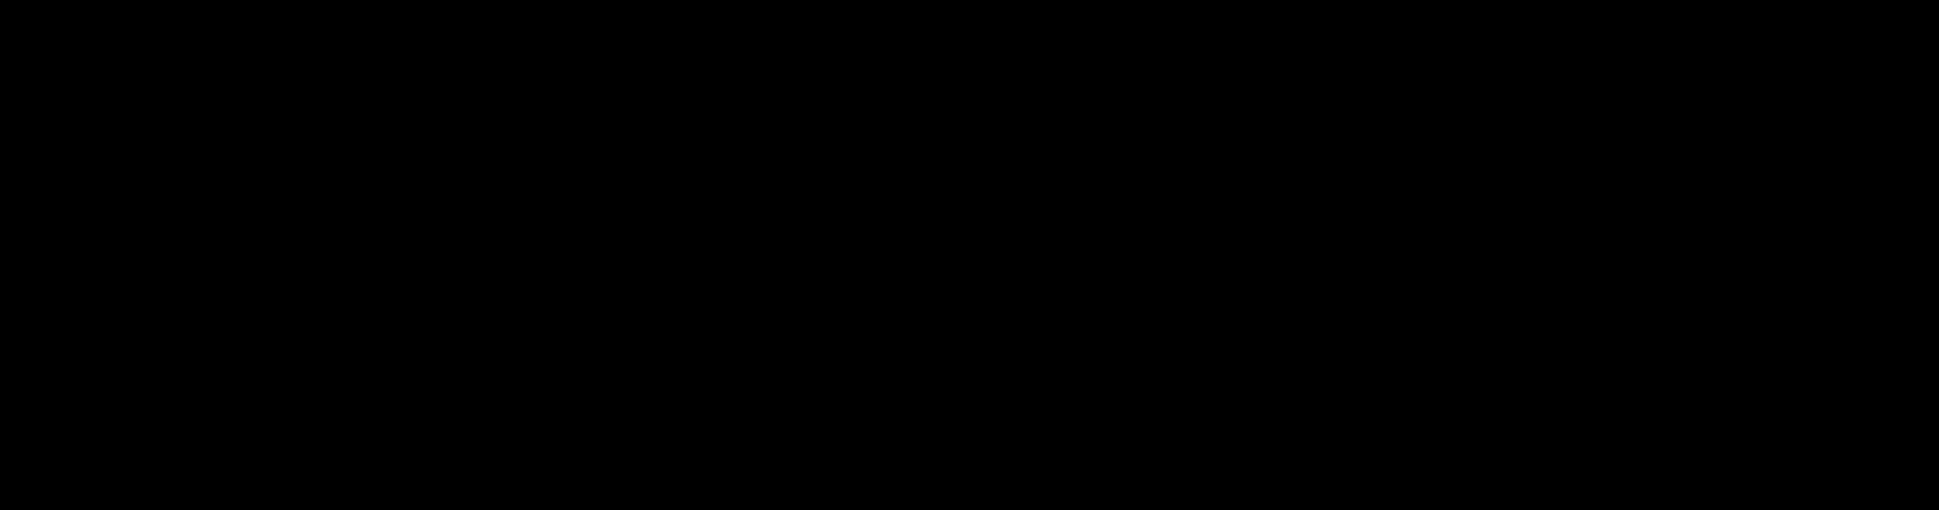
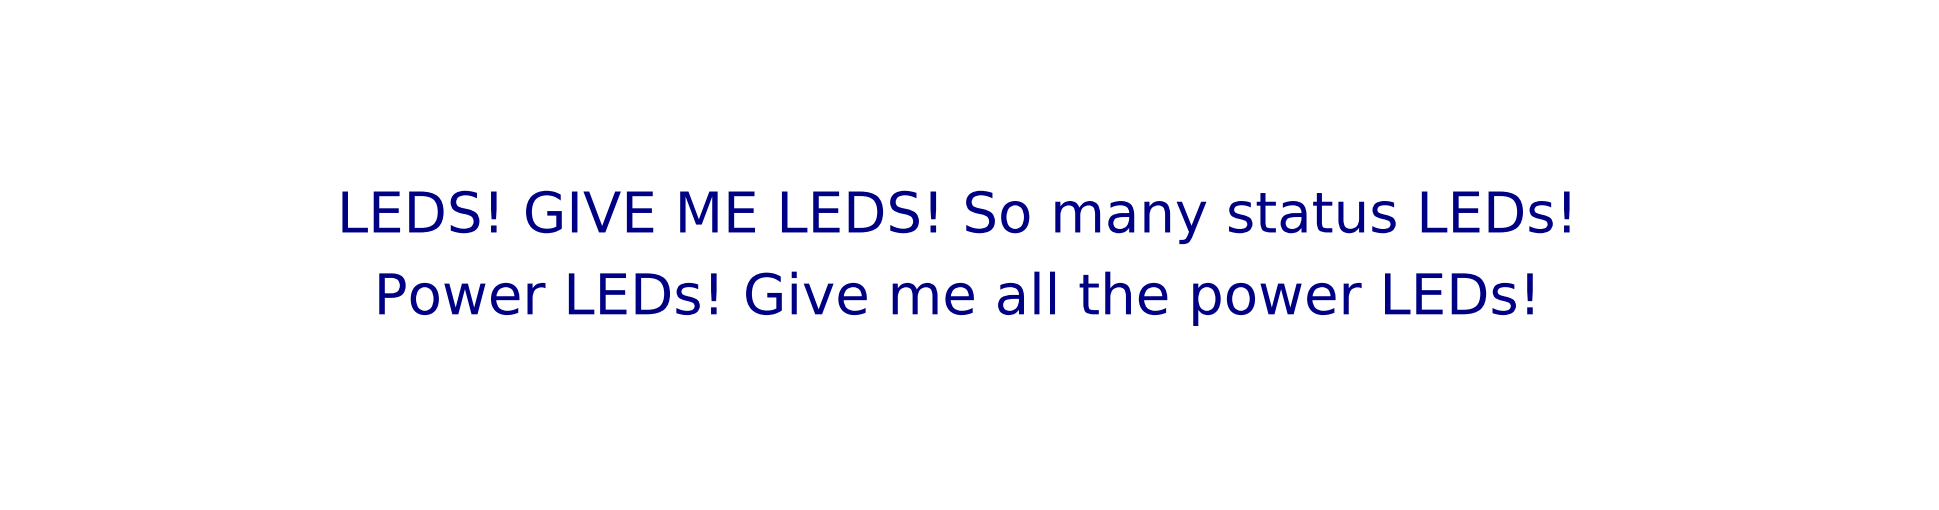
text: none -> LEDS! GIVE ME LEDS! So many status LEDs! (956, 217)
text: none -> Power LEDs! Give me all the power LEDs! (956, 298)

